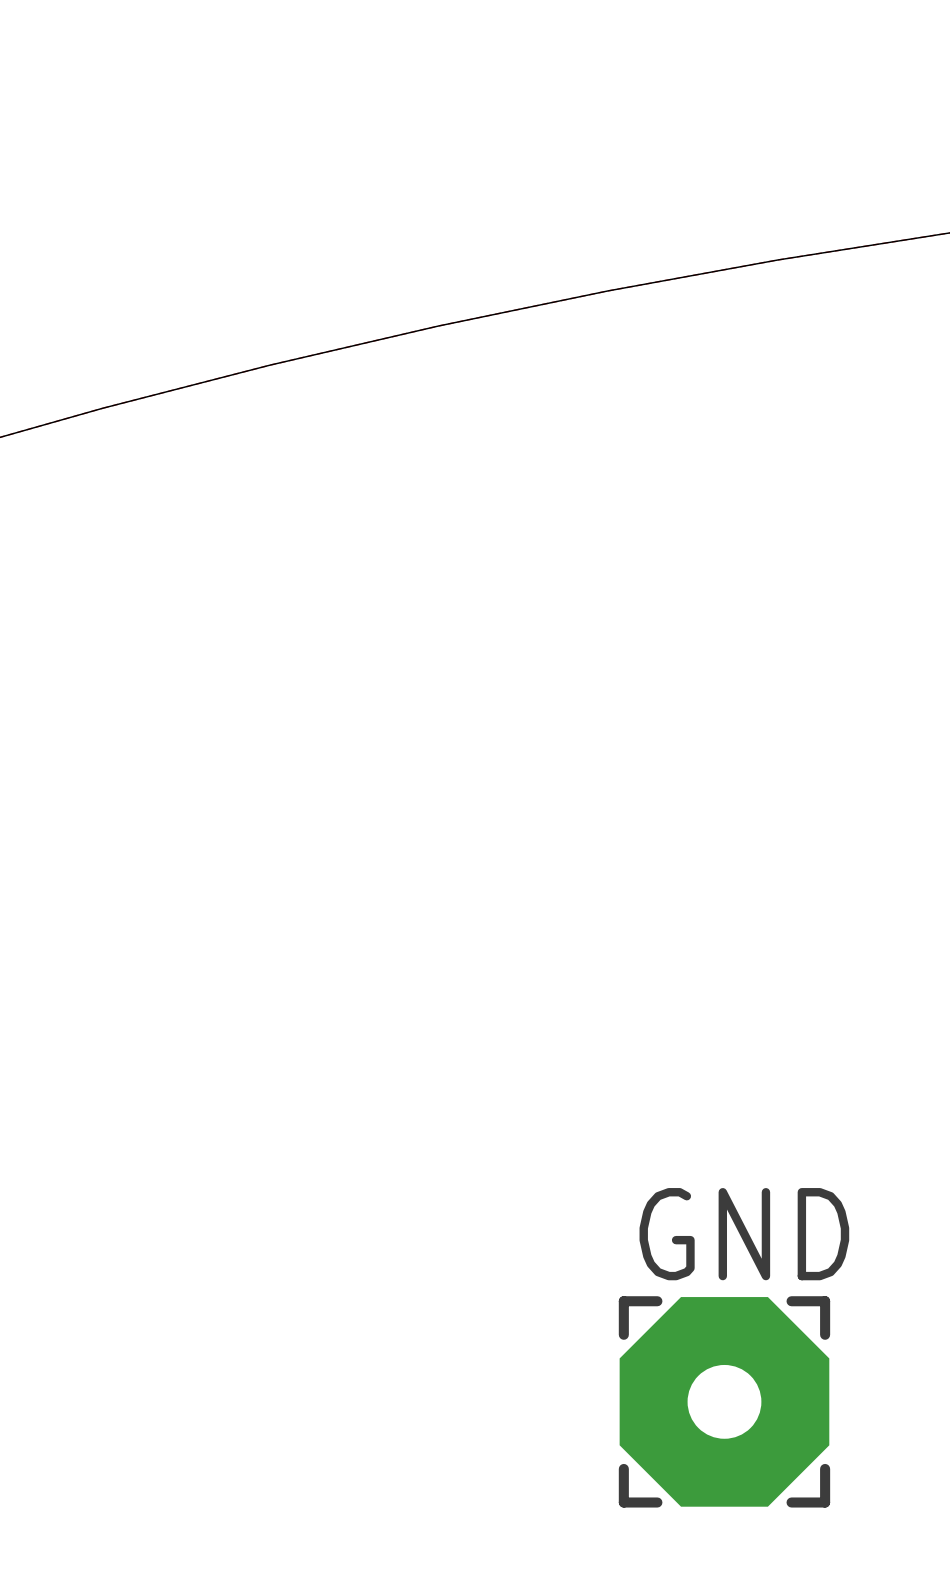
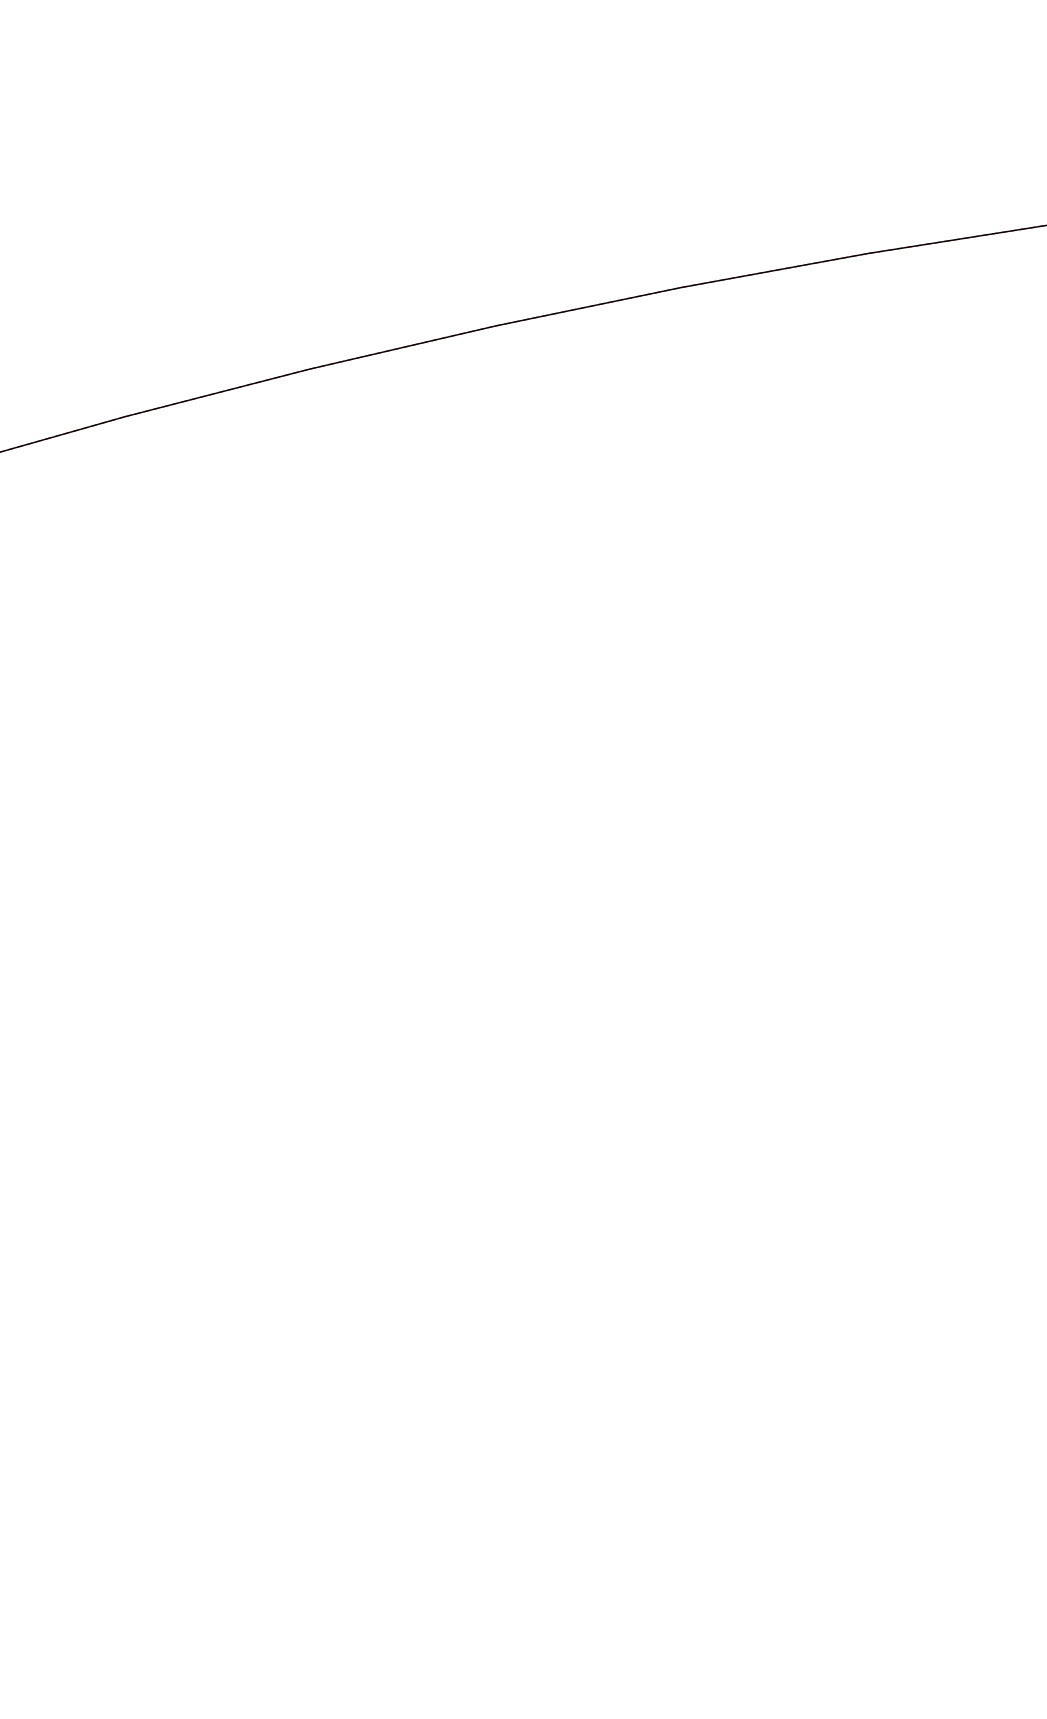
GND: (724, 1401) -> none

